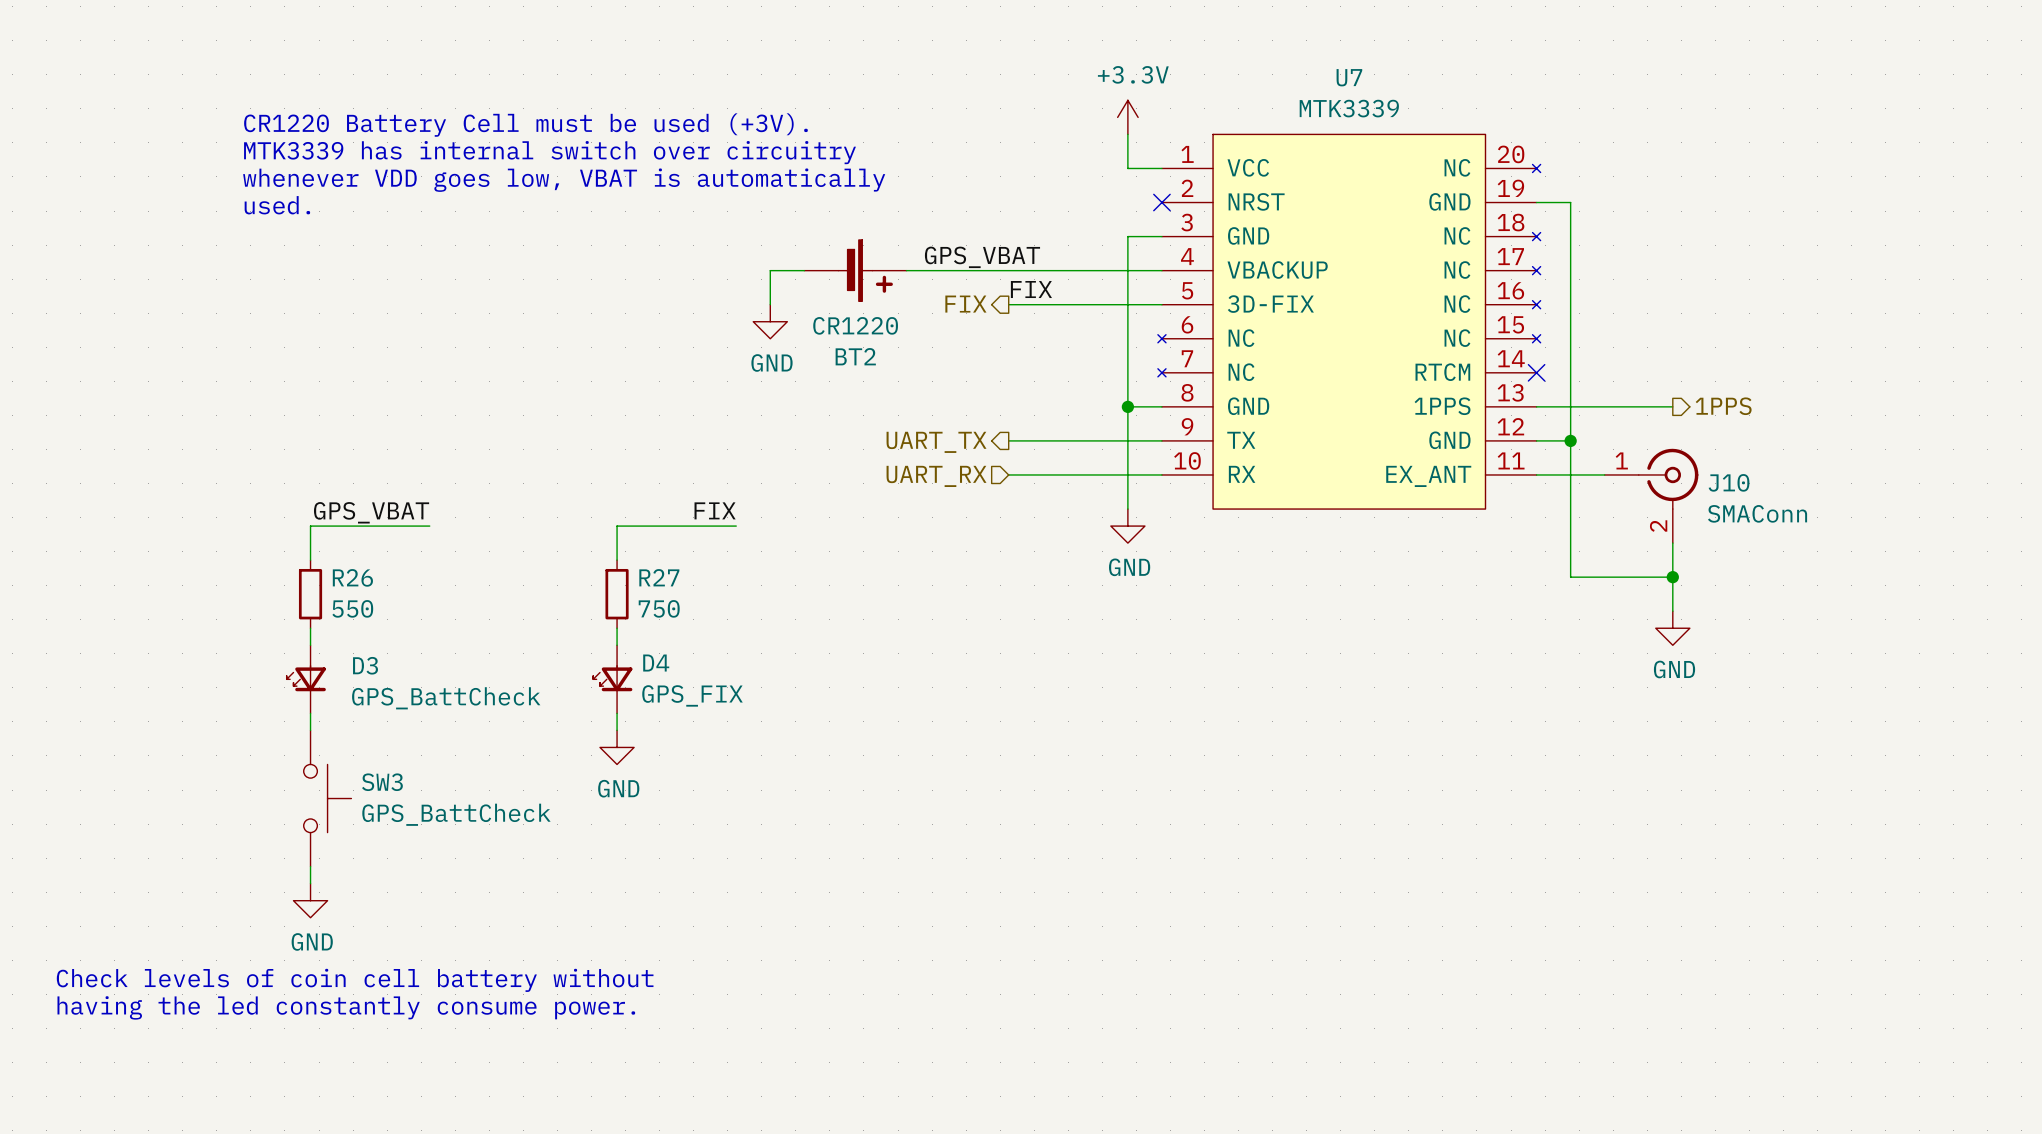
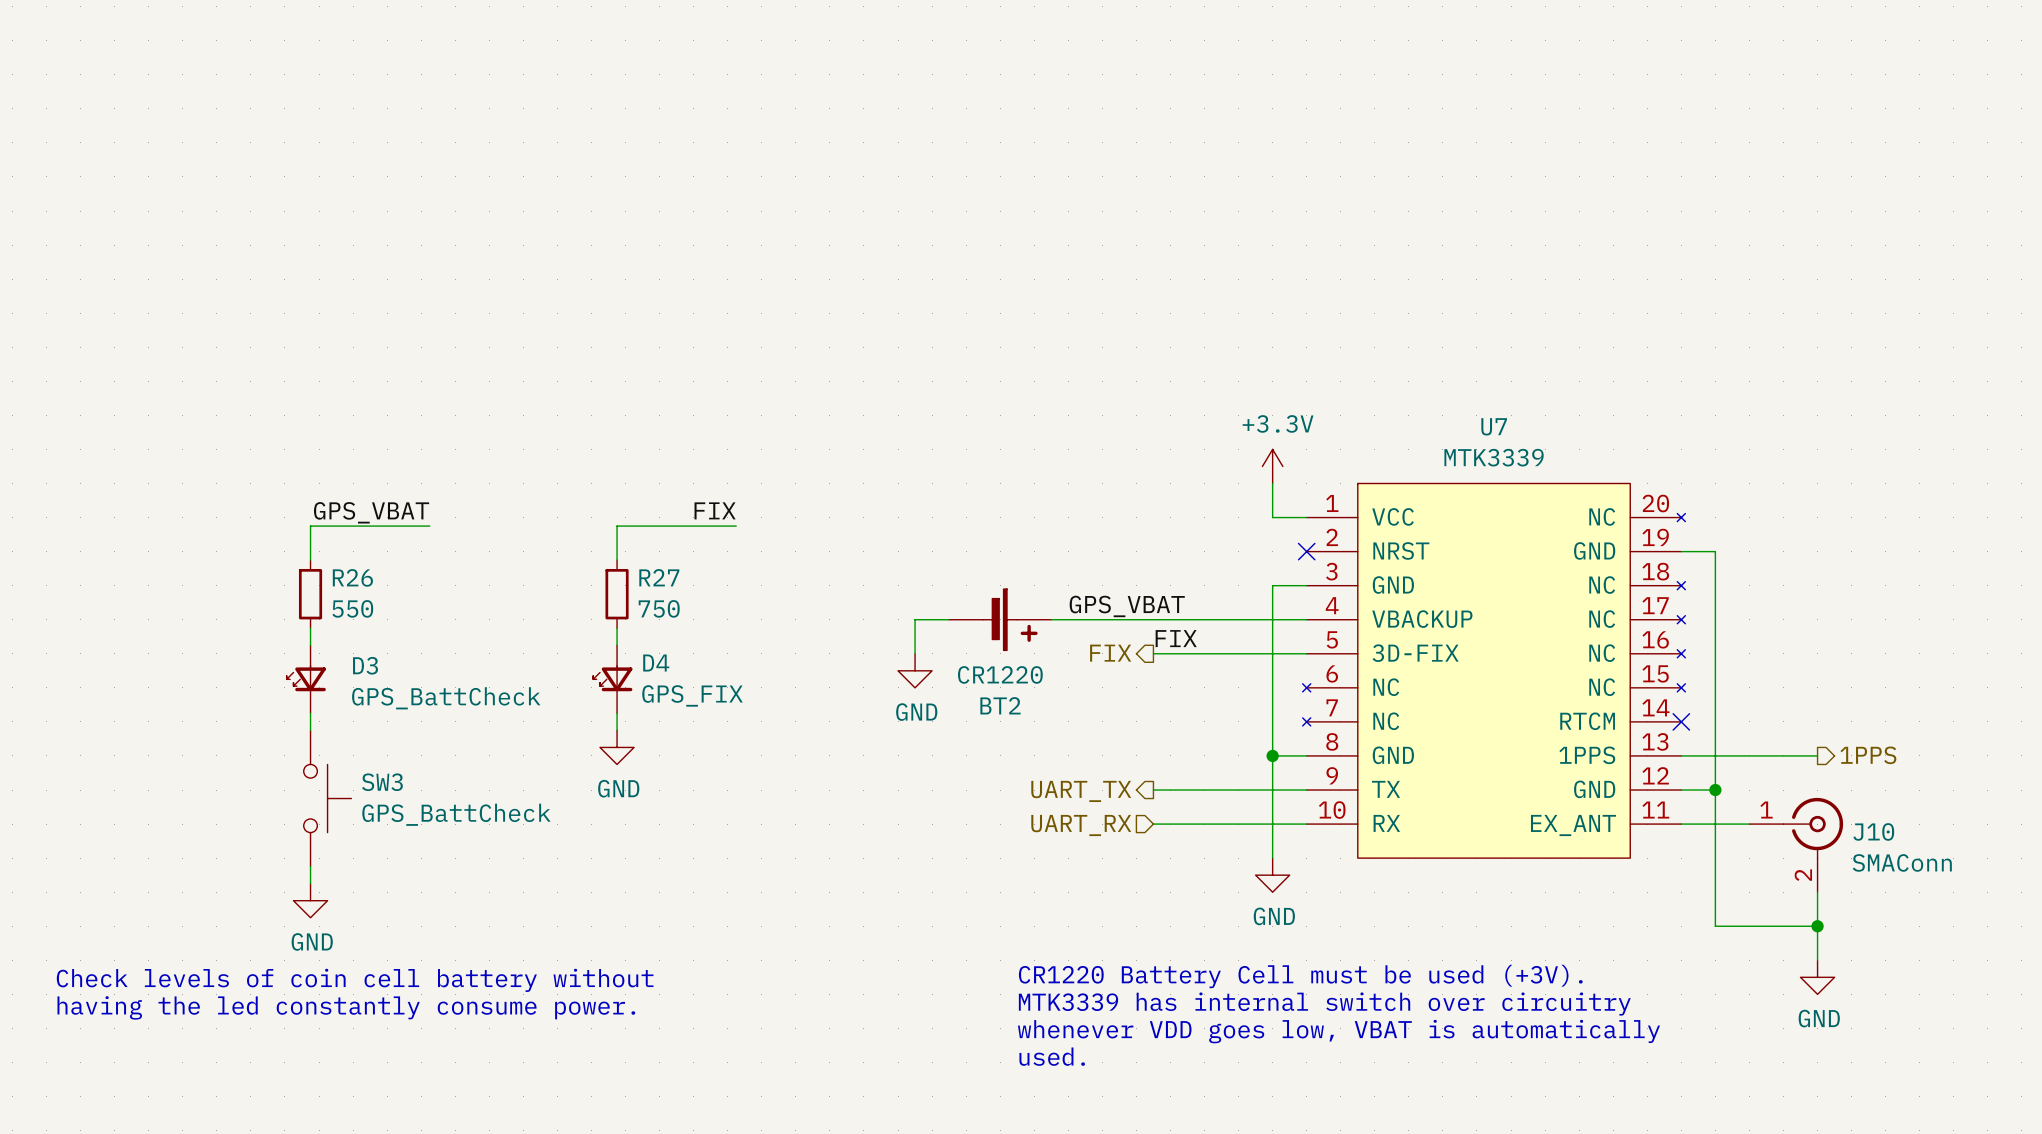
power symbol: +3.3V (1127, 117) -> none
text: CR1220 Battery Cell must be used (+3V). (525, 125) -> none
wire: (1127, 134) (1127, 168) (1161, 168) -> none
text: MTK3339 has internal switch over circuitry (550, 152) -> none
text: whenever VDD goes low, VBAT is automatically (564, 180) -> none
no-connect mark: (1161, 202) -> none
wire: (1536, 202) (1570, 202) (1570, 577) (1672, 577) -> none
text: used. (277, 205) -> none
wire: (1161, 236) (1127, 236) (1127, 509) -> none
label: GPS_VBAT (982, 257) -> none
wire: (804, 270) (770, 270) (770, 304) -> none
BT2 position: (855, 270) -> (1000, 619)
wire: (906, 270) (1161, 270) -> none
label: FIX (1031, 289) -> none
hierarchical label: FIX (965, 304) -> none
wire: (1008, 304) (1161, 304) -> none
power symbol: GND (770, 321) -> none
U7 position: (1349, 321) -> (1494, 670)
no-connect mark: (1536, 372) -> none
wire: (1127, 406) (1161, 406) -> none
junction: (1127, 406) -> none
wire: (1536, 406) (1672, 406) -> none
hierarchical label: 1PPS (1723, 406) -> none
wire: (1008, 440) (1161, 440) -> none
wire: (1536, 440) (1570, 440) -> none
junction: (1570, 440) -> none
hierarchical label: UART_TX (936, 442) -> none
power symbol: none -> +3.3V (1272, 466)
wire: (1008, 474) (1161, 474) -> (1153, 653) (1306, 653)
wire: (1536, 474) (1604, 474) -> none
hierarchical label: UART_RX (936, 476) -> none
wire: none -> (1272, 483) (1272, 517) (1306, 517)
J10 position: (1651, 495) -> (1796, 845)
power symbol: GND (1127, 526) -> none
wire: (1672, 543) (1672, 611) -> none
no-connect mark: none -> (1306, 551)
wire: none -> (1681, 551) (1715, 551) (1715, 926) (1817, 926)
junction: (1672, 577) -> none
wire: none -> (1306, 585) (1272, 585) (1272, 858)
label: none -> GPS_VBAT (1127, 606)
wire: none -> (949, 619) (915, 619) (915, 653)
wire: none -> (1051, 619) (1306, 619)
power symbol: GND (1672, 628) -> none
label: none -> FIX (1176, 638)
hierarchical label: none -> FIX (1110, 653)
power symbol: none -> GND (915, 670)
no-connect mark: none -> (1681, 721)
wire: none -> (1272, 755) (1306, 755)
junction: none -> (1272, 755)
wire: none -> (1681, 755) (1817, 755)
hierarchical label: none -> 1PPS (1868, 755)
wire: none -> (1153, 790) (1306, 790)
wire: none -> (1681, 790) (1715, 790)
junction: none -> (1715, 790)
hierarchical label: none -> UART_TX (1081, 791)
wire: none -> (1153, 824) (1306, 824)
wire: none -> (1681, 824) (1749, 824)
hierarchical label: none -> UART_RX (1081, 825)
power symbol: none -> GND (1272, 875)
wire: none -> (1817, 892) (1817, 960)
junction: none -> (1817, 926)
text: none -> CR1220 Battery Cell must be used (+3V). (1300, 976)
power symbol: none -> GND (1817, 977)
text: none -> MTK3339 has internal switch over circuitry (1324, 1004)
text: none -> whenever VDD goes low, VBAT is automatically (1338, 1031)
text: none -> used. (1052, 1056)

